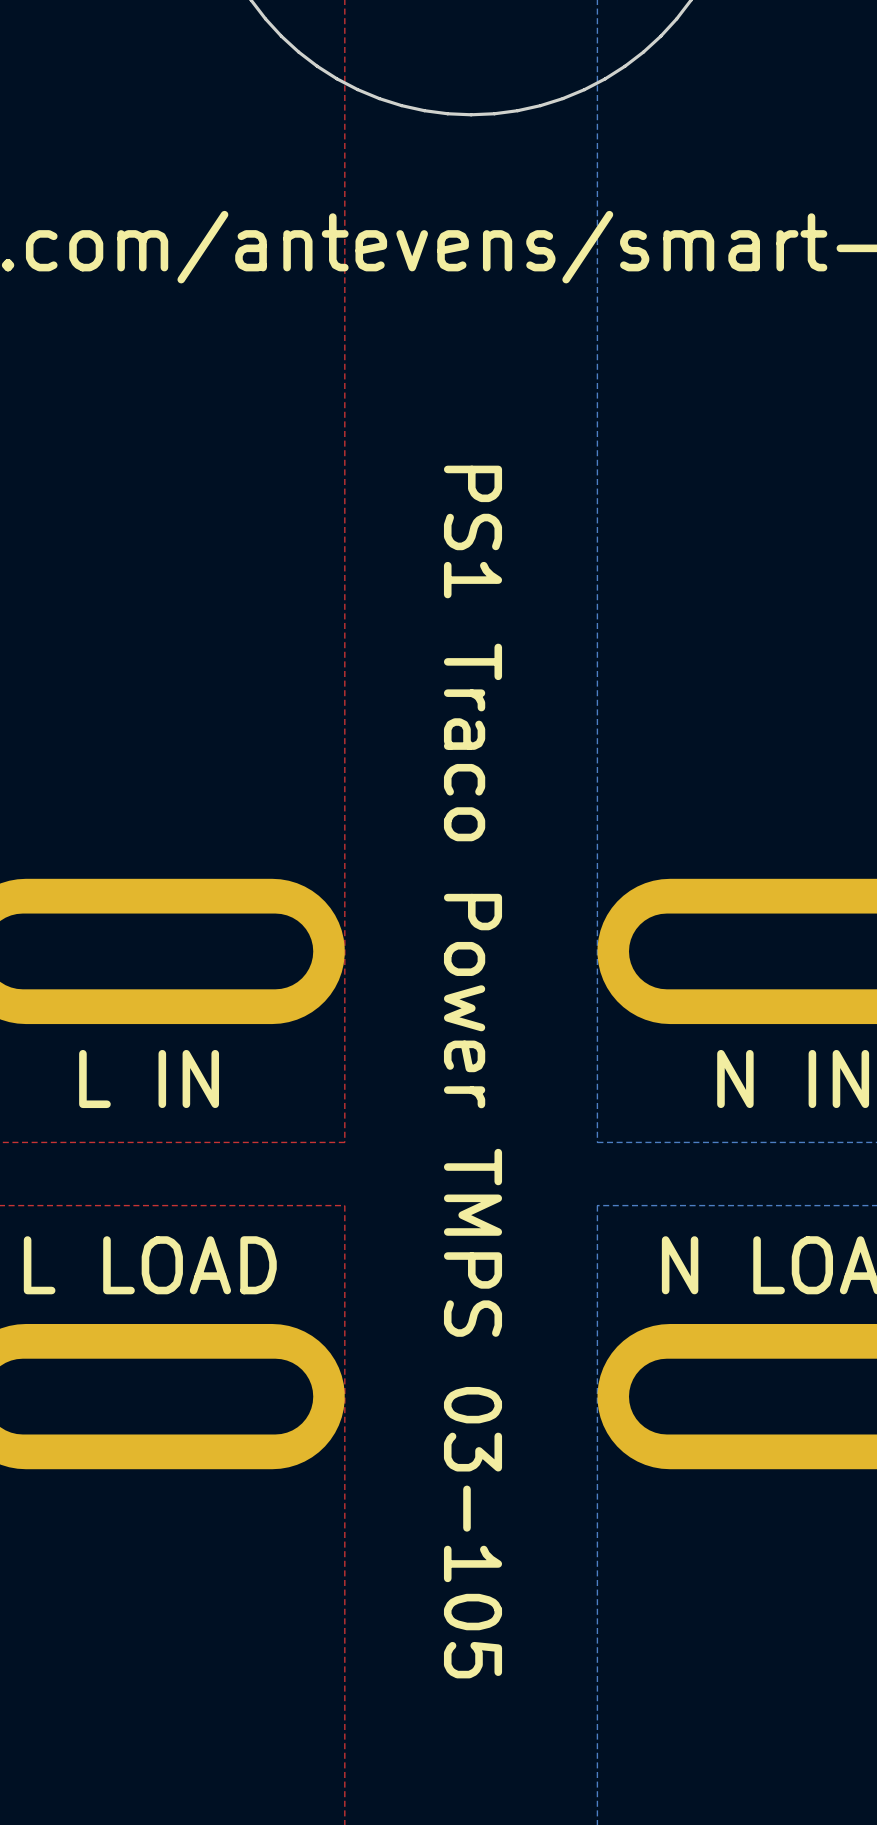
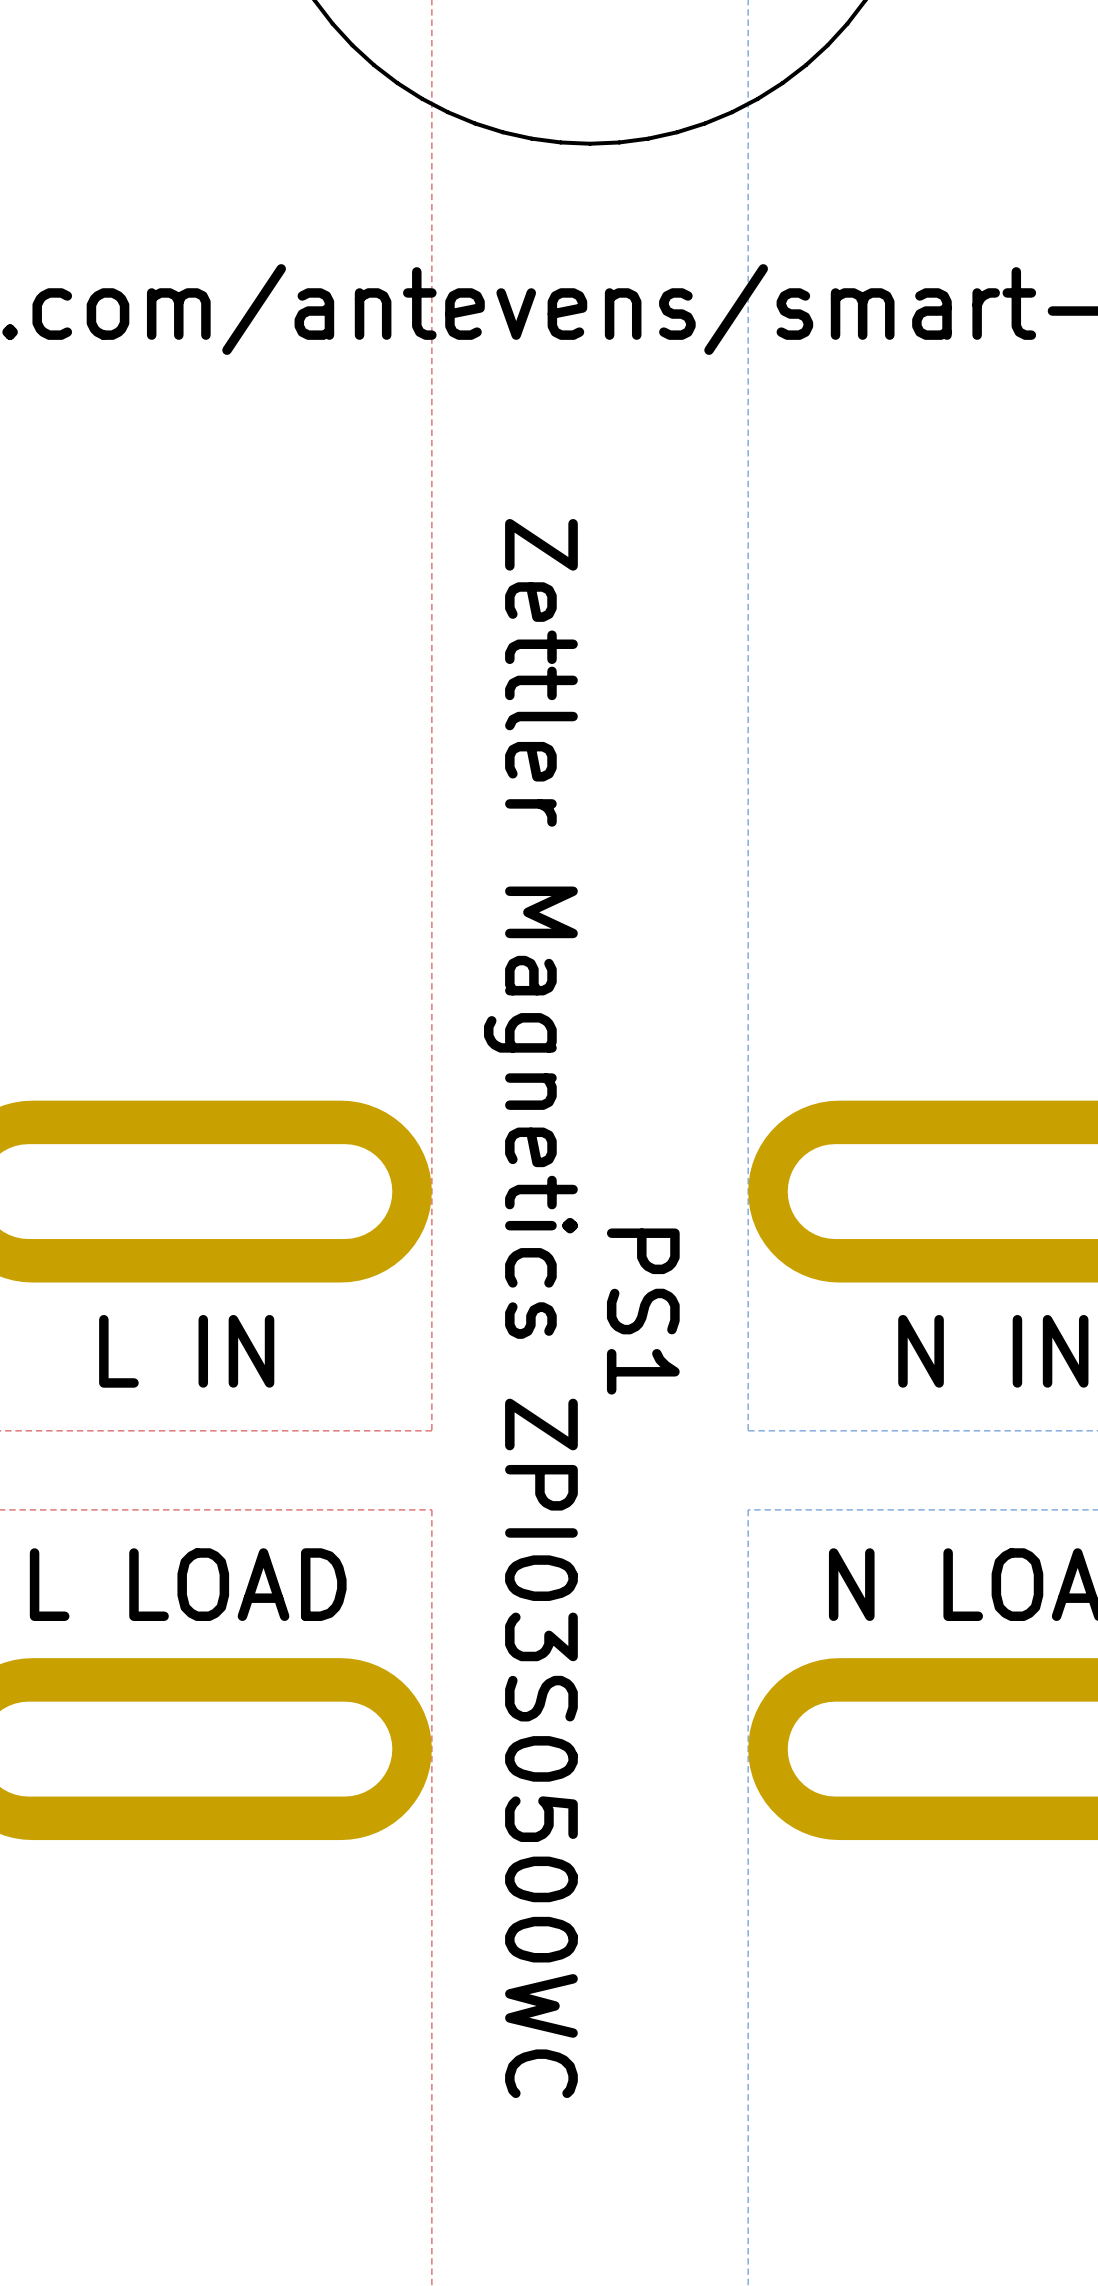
text: none -> Zettler Magnetics ZPI03S0500WC (530, 1308)
text: none -> PS1 (643, 1311)
text: PS1 Traco Power TMPS 03-105 (473, 1072) -> none

